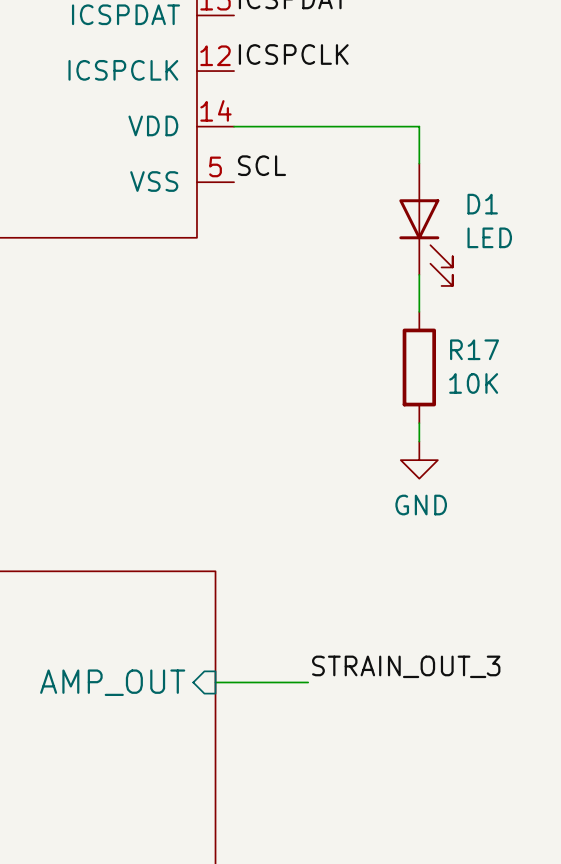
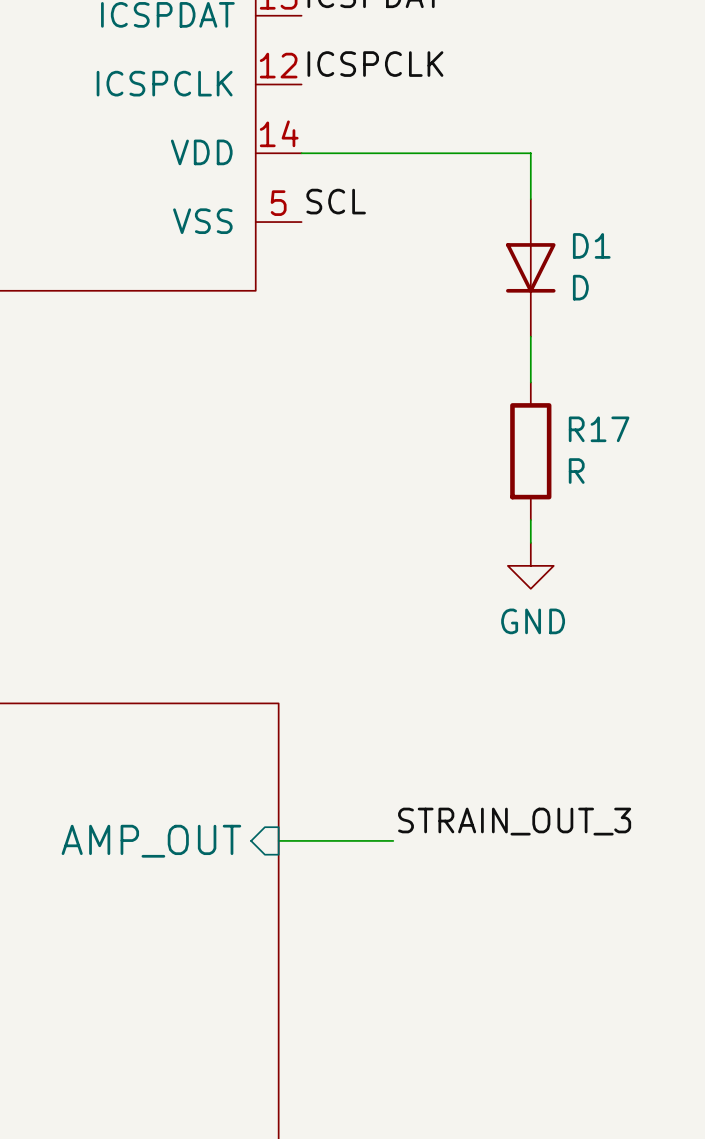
D1 symbol: [399, 163, 453, 286] -> [506, 199, 556, 337]
D1 value: LED (489, 237) -> D (580, 287)
R17 value: 10K (473, 383) -> R (576, 471)

